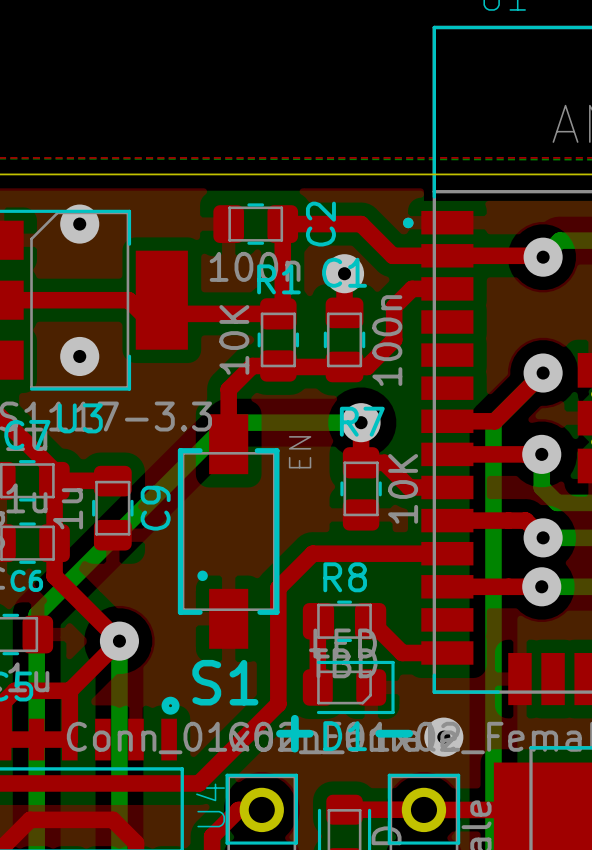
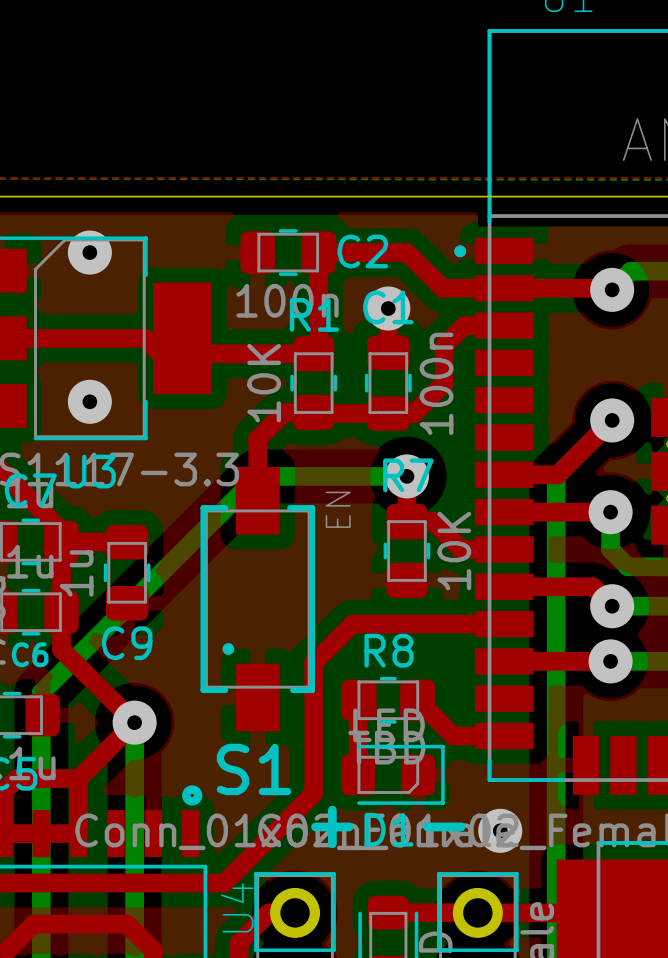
C2 name rotation: 0° (320, 224) -> 90° clockwise (362, 251)
C9 name rotation: 0° (155, 508) -> 90° clockwise (127, 643)
C9 name position: C9 (155, 508) -> C9 (127, 643)

